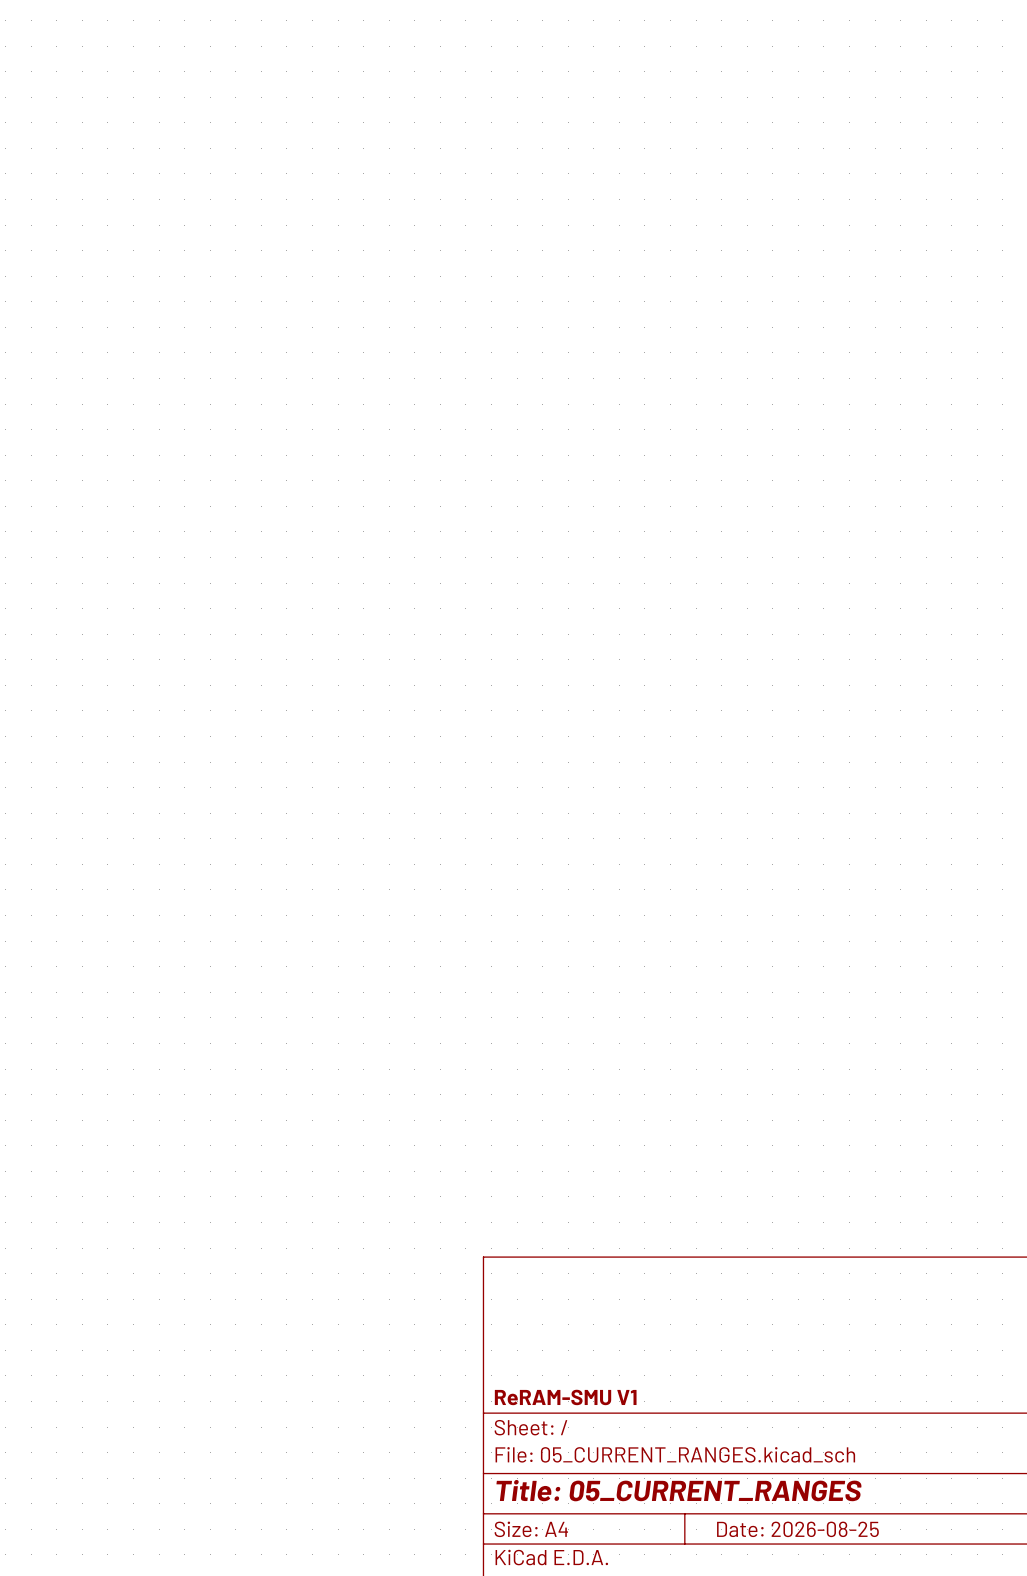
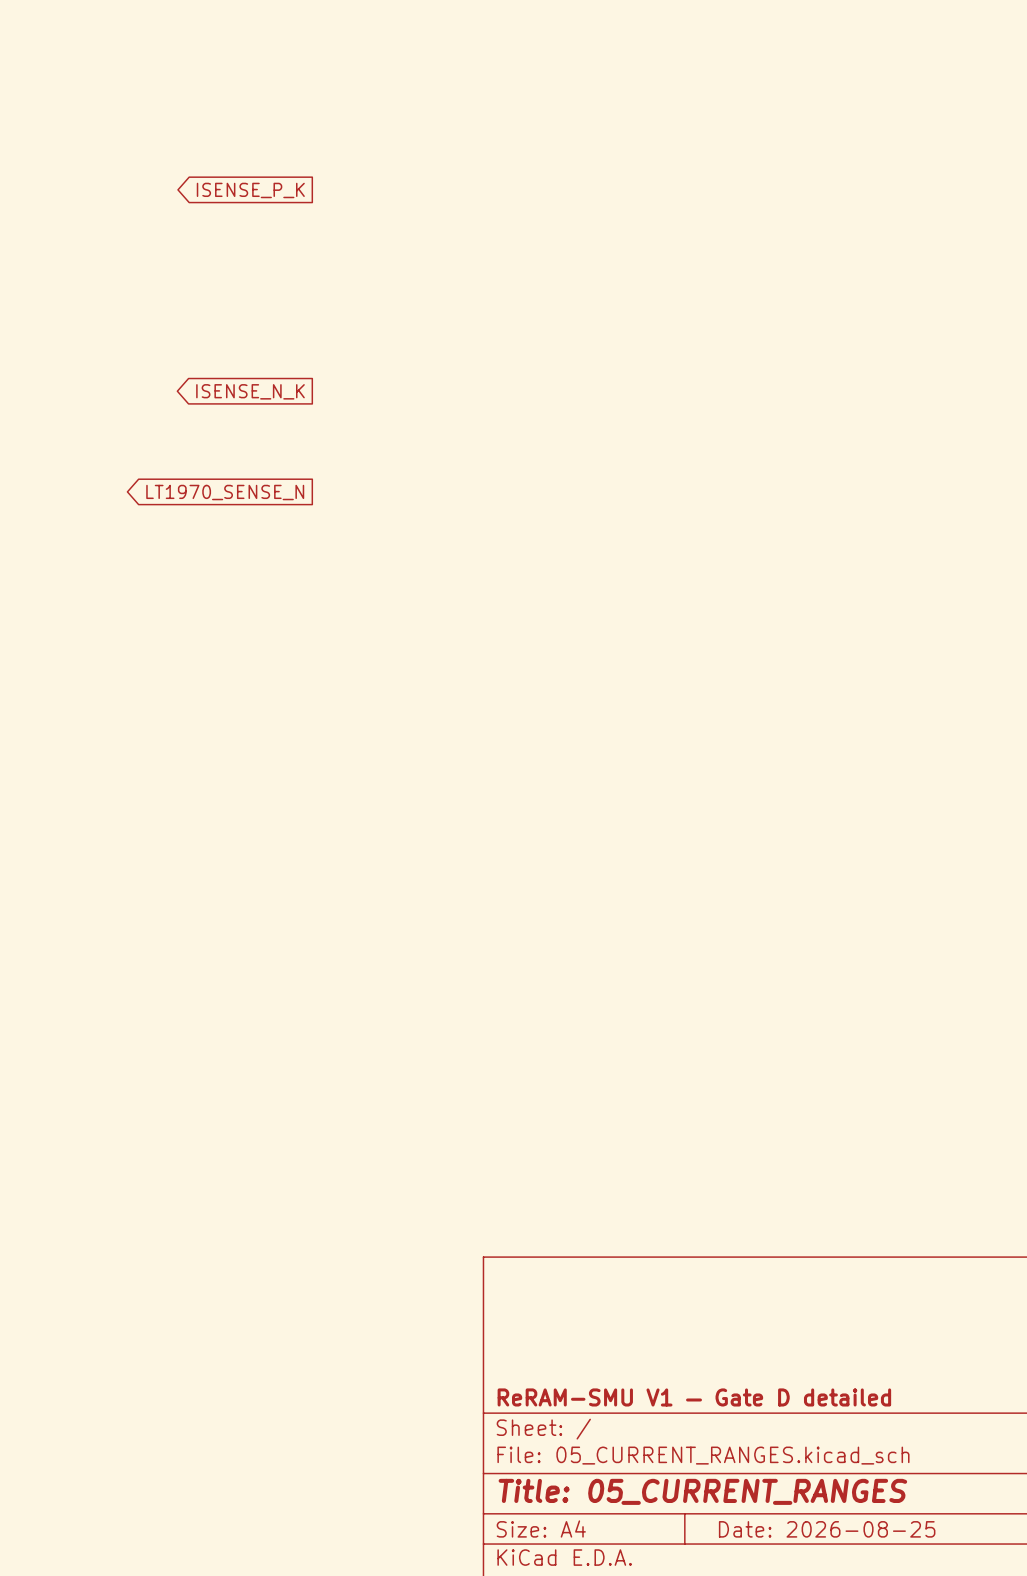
global label: none -> ISENSE_P_K (250, 190)
global label: none -> ISENSE_N_K (250, 391)
global label: none -> LT1970_SENSE_N (225, 492)
title block: ReRAM-SMU V1 (565, 1397) -> ReRAM-SMU V1 — Gate D detailed (694, 1397)

